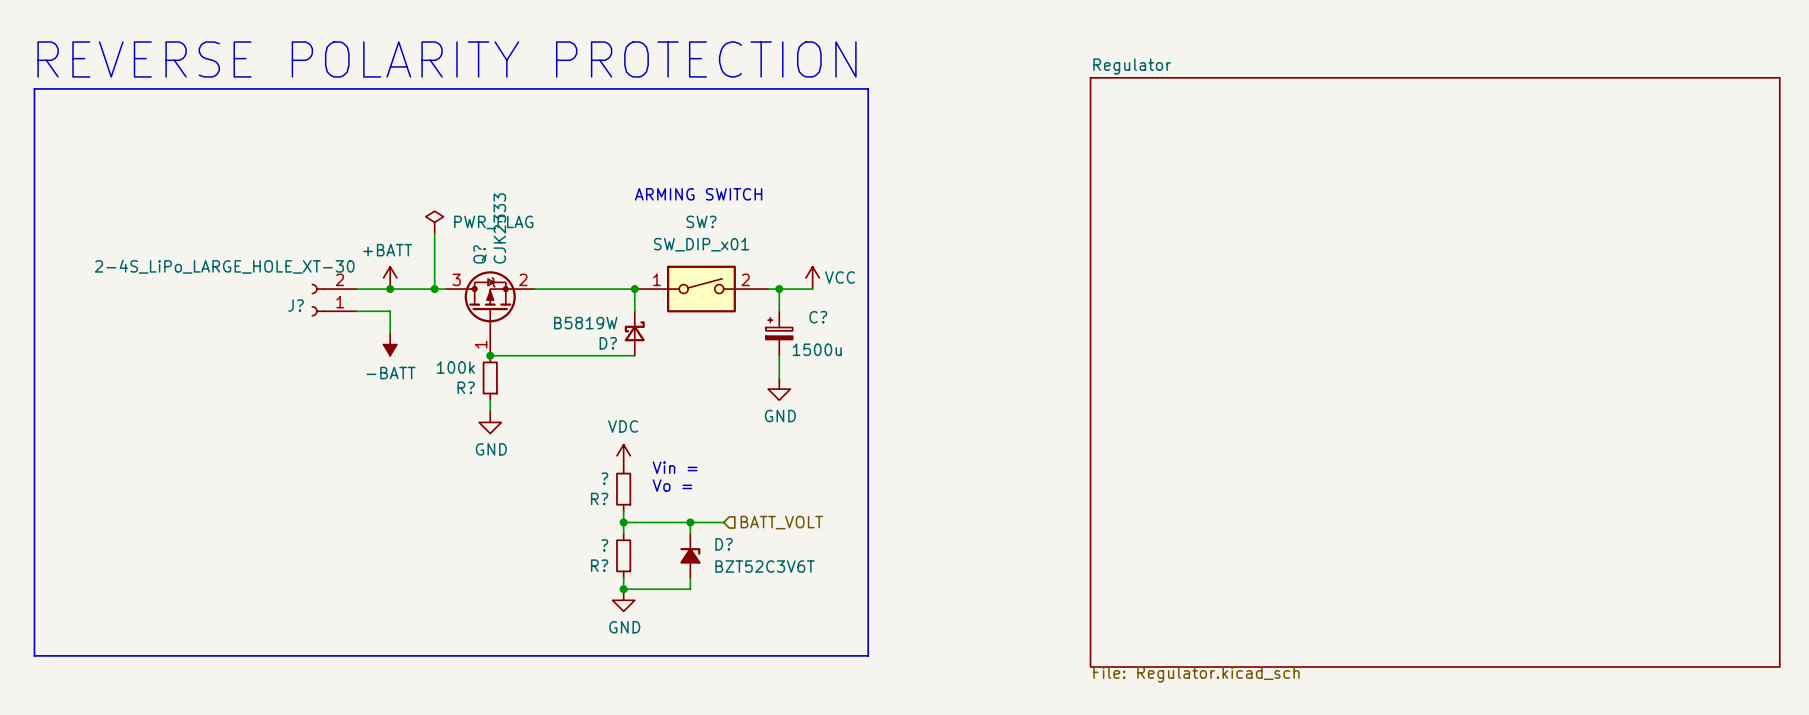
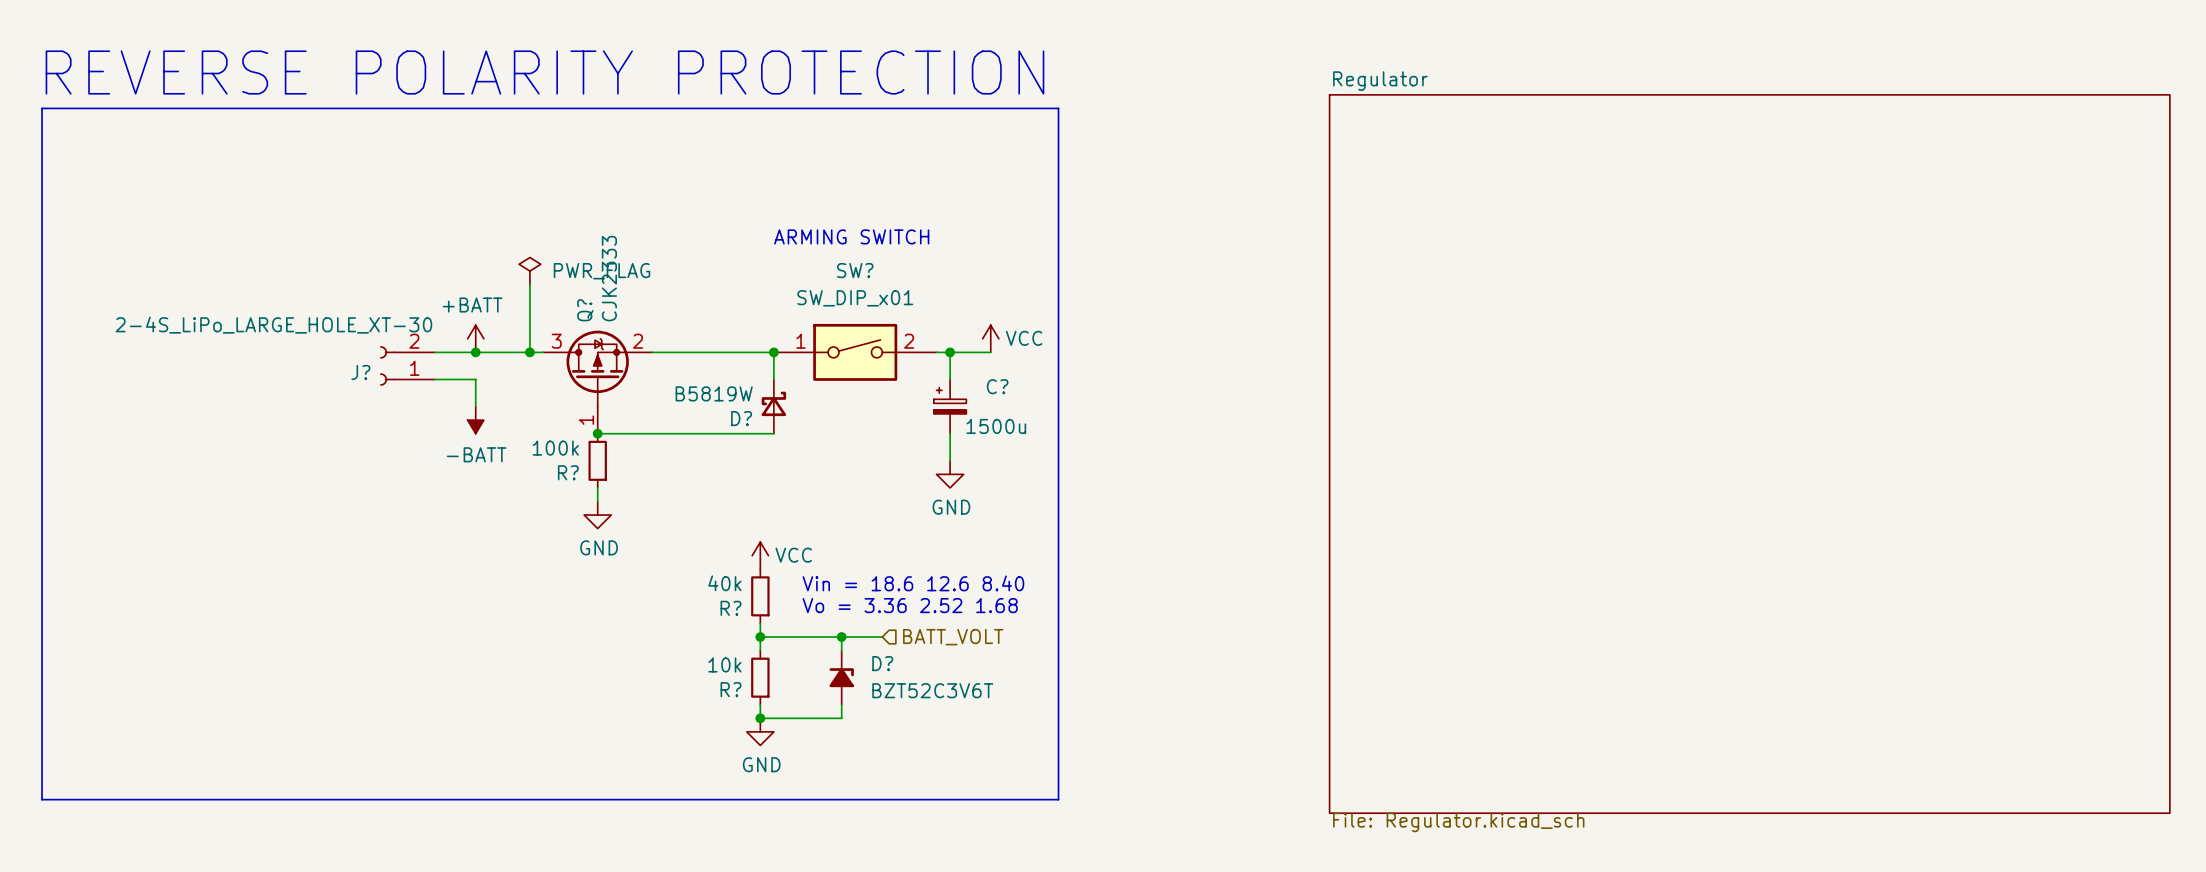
power symbol: VDC (623, 455) -> VCC (760, 555)
text: Vin = (675, 467) -> none
R? value: ? (604, 478) -> 40k (724, 583)
text: none -> Vin = 18.6 12.6 8.40 (913, 583)
text: Vo = (672, 485) -> none
text: none -> Vo = 3.36 2.52 1.68 (910, 605)
R? value: ? (604, 545) -> 10k (724, 664)

